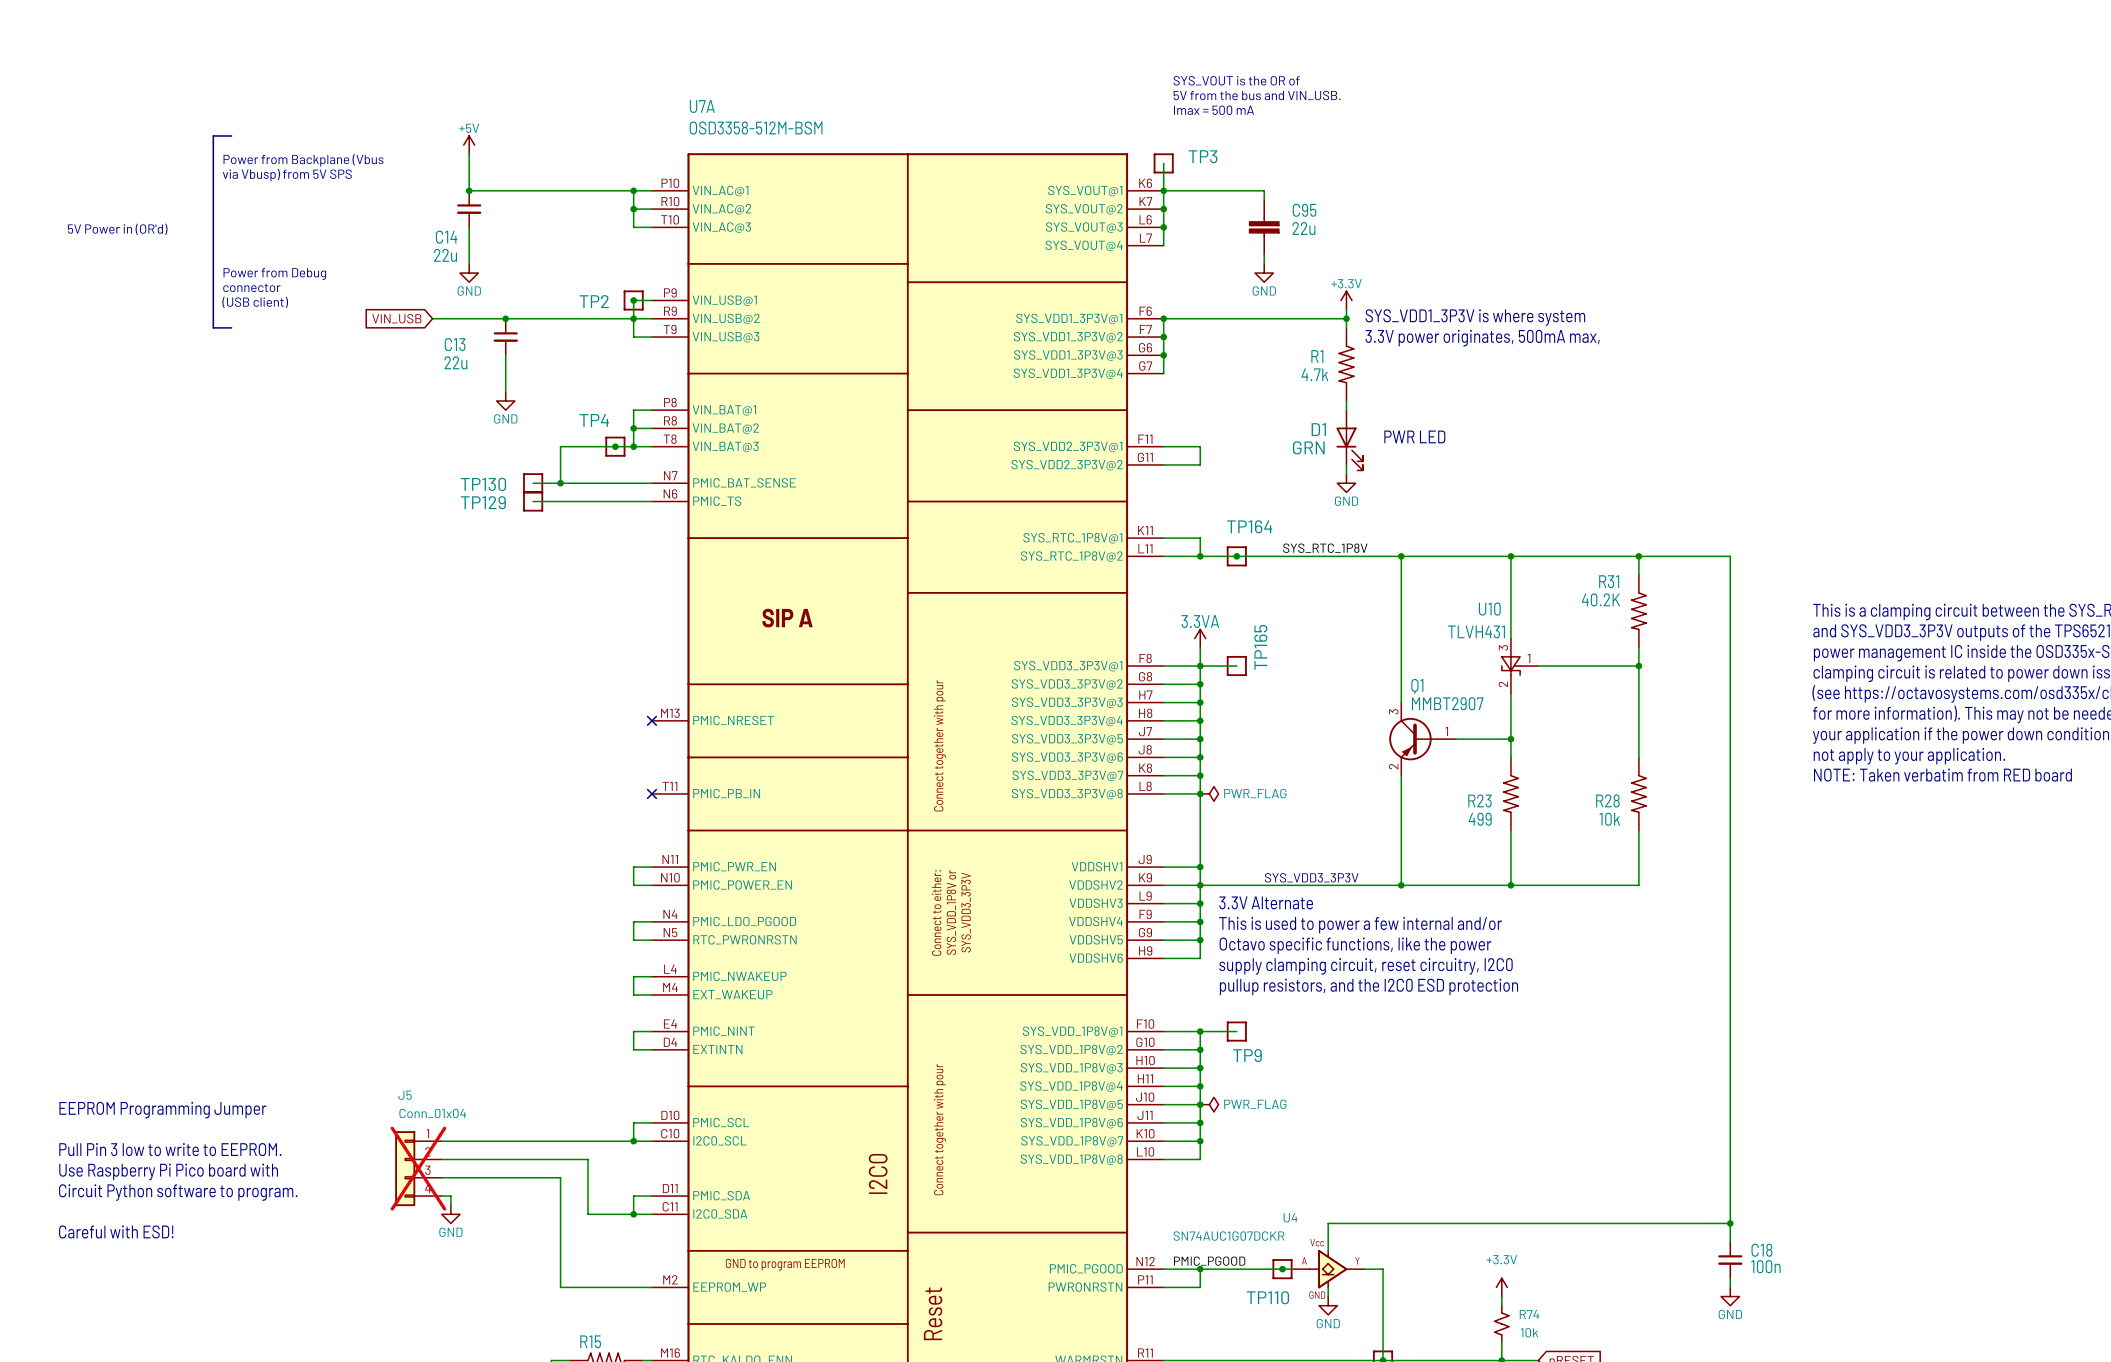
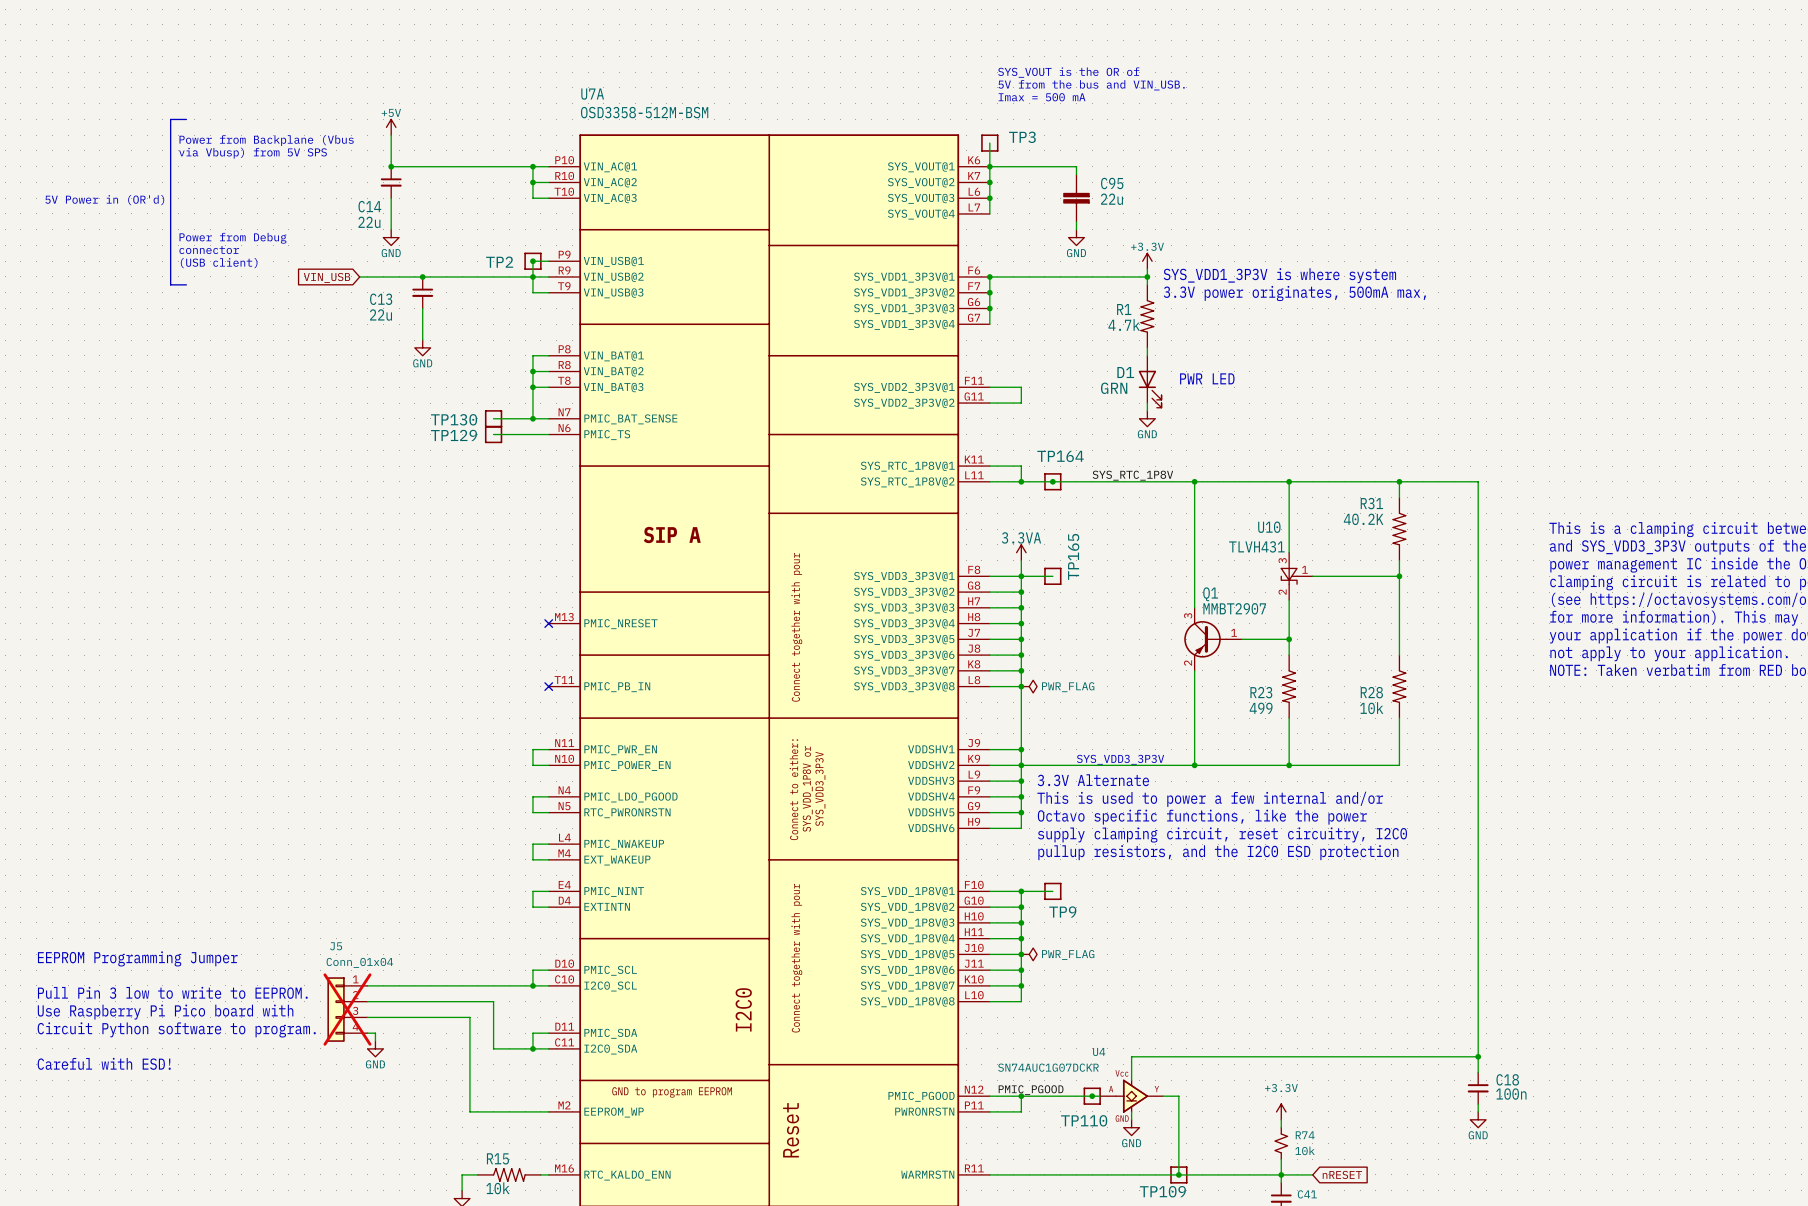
junction: (615, 446) -> none
TP4: (615, 446) -> none
wire: (633, 446) (560, 446) (560, 483) -> (532, 387) (532, 418)
wire: (533, 483) (587, 483) -> none
TP130 position: (533, 483) -> (493, 418)
junction: (560, 483) -> none
junction: none -> (532, 418)
wire: (533, 501) (587, 501) -> none
TP129 position: (533, 501) -> (493, 434)

